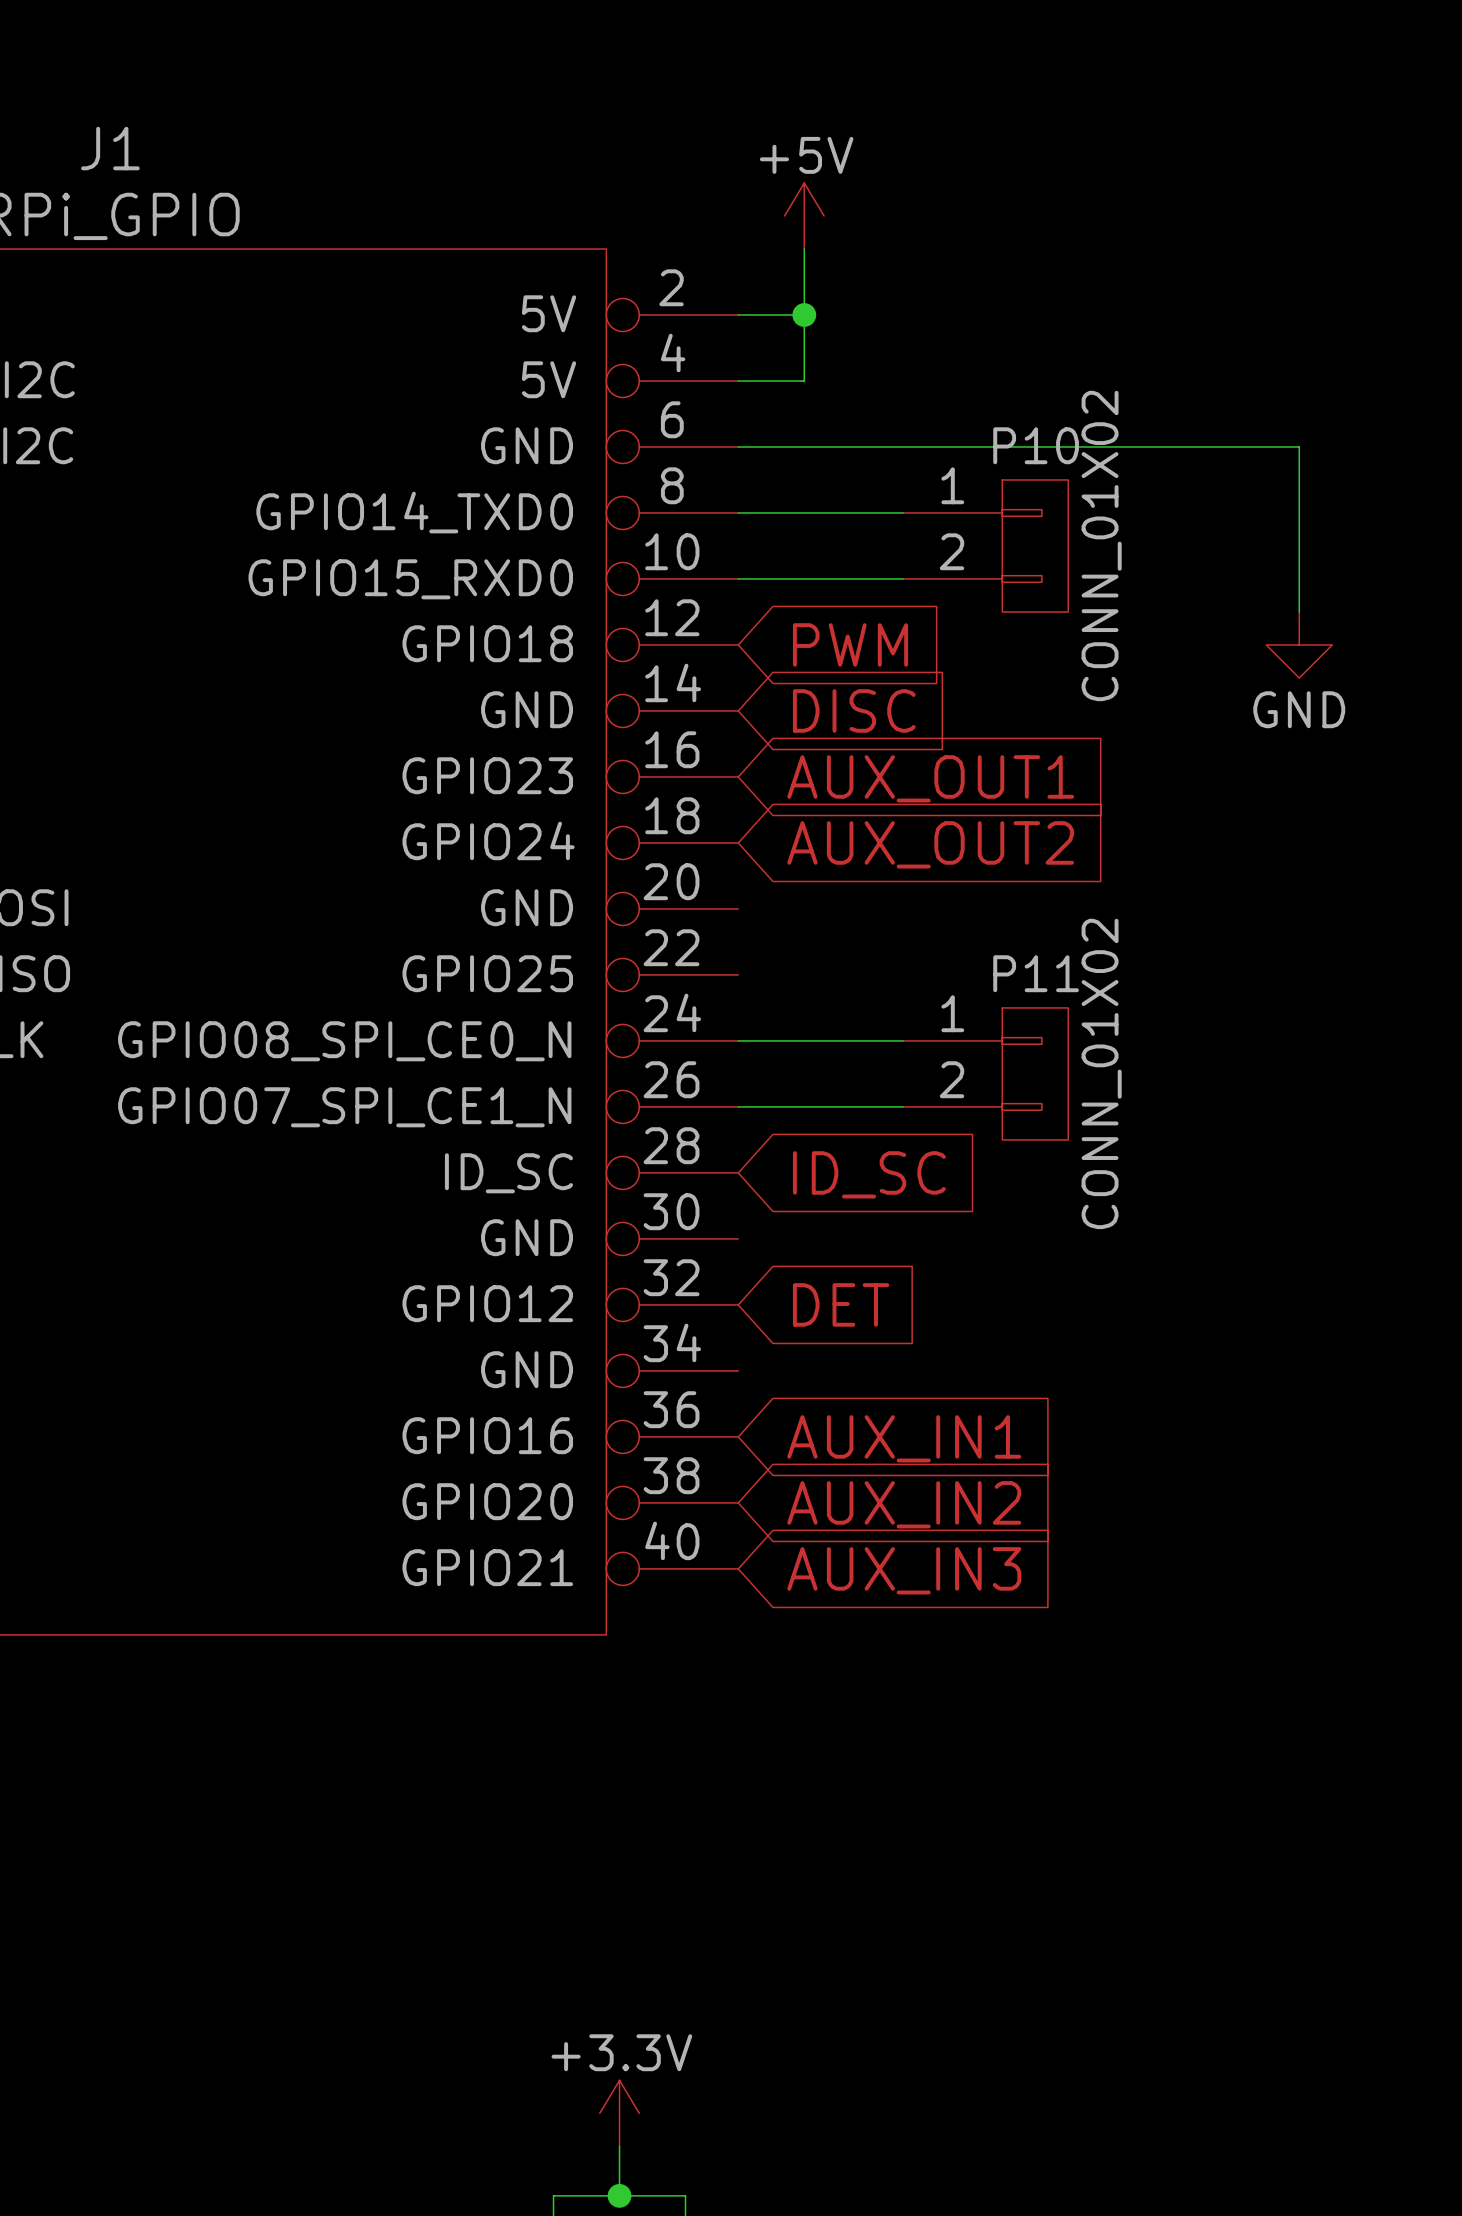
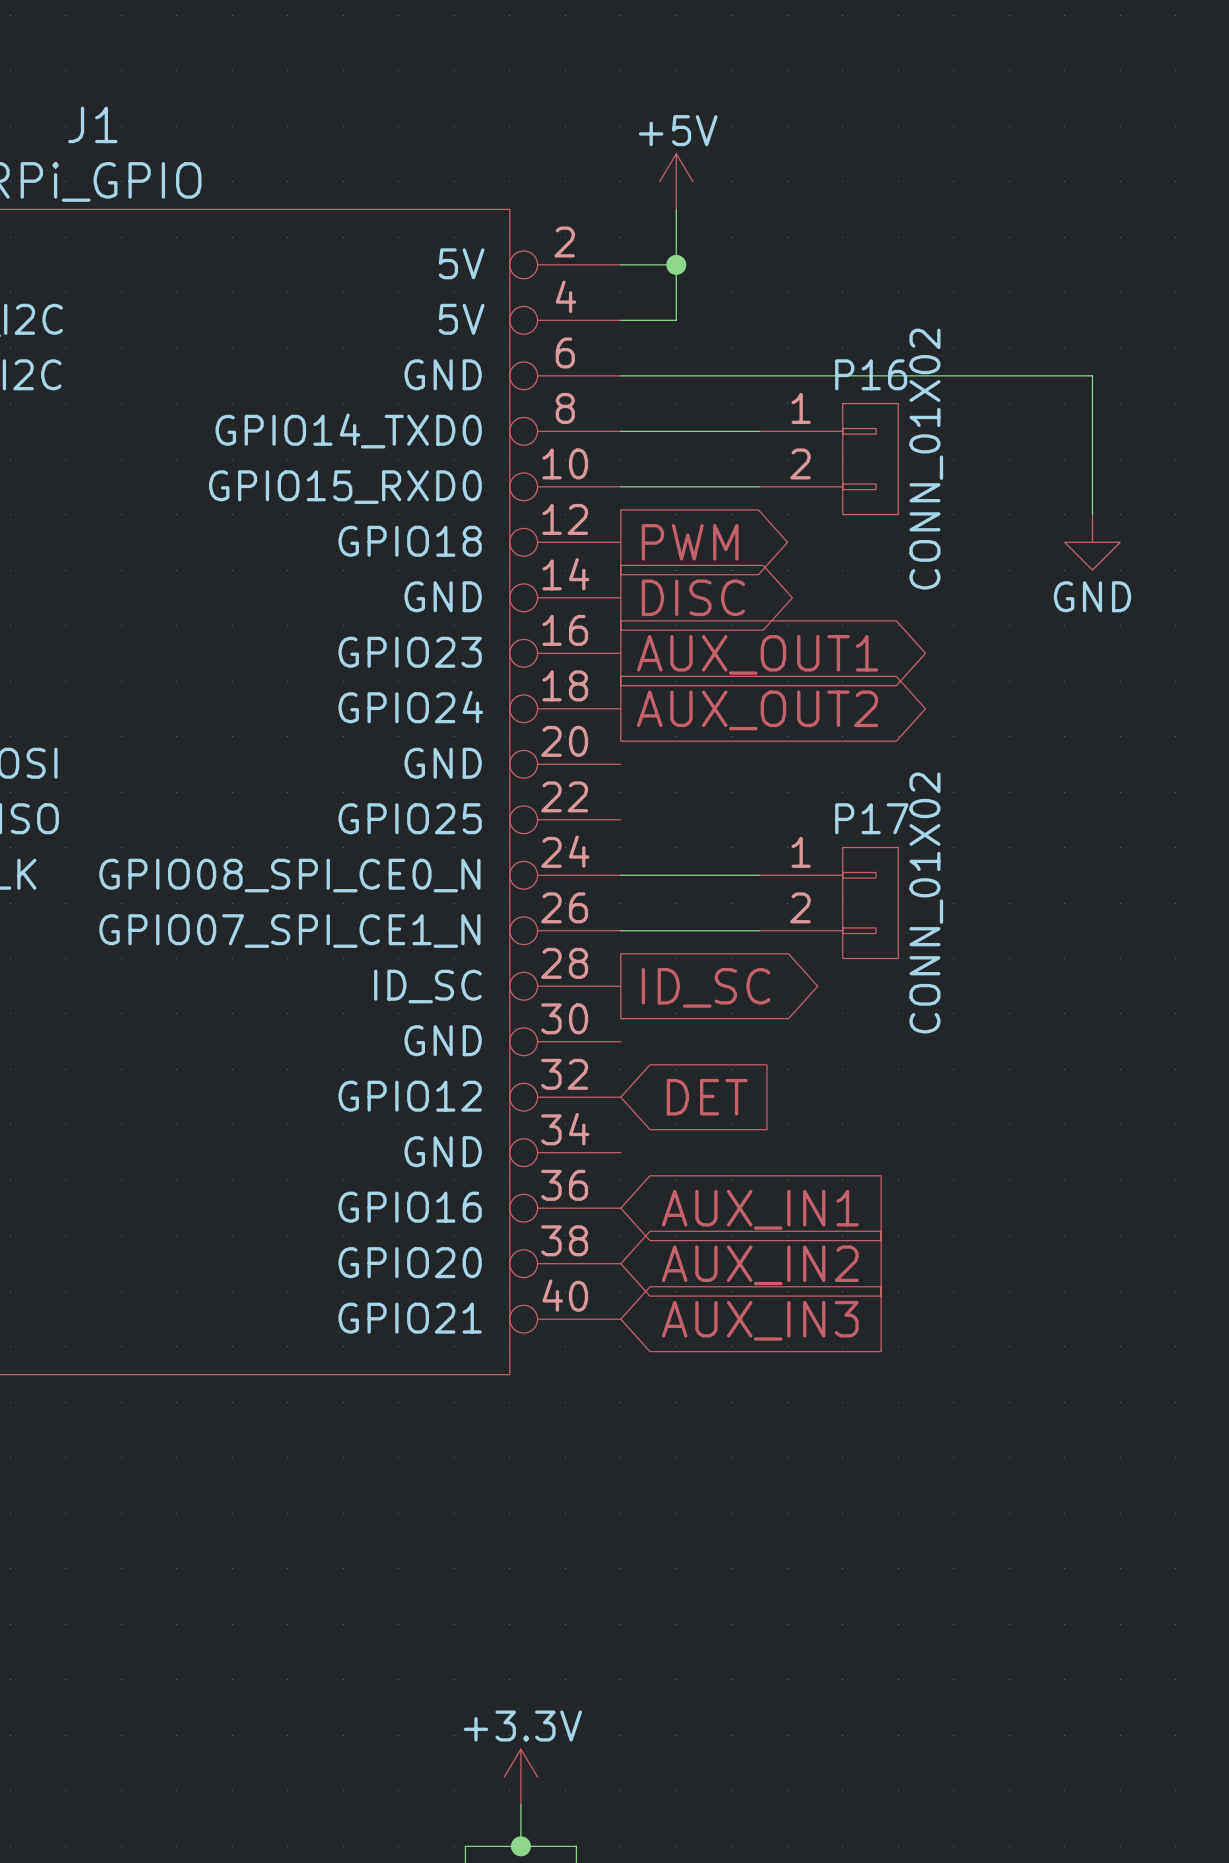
P10 name: P10 (1036, 445) -> P16 (871, 374)
global label shape: input (850, 644) -> output (690, 542)
global label shape: input (854, 710) -> output (693, 597)
global label shape: input (930, 778) -> output (757, 654)
global label shape: input (930, 844) -> output (757, 710)
P11 name: P11 (1036, 973) -> P17 (871, 818)
global label shape: input (869, 1174) -> output (706, 987)

